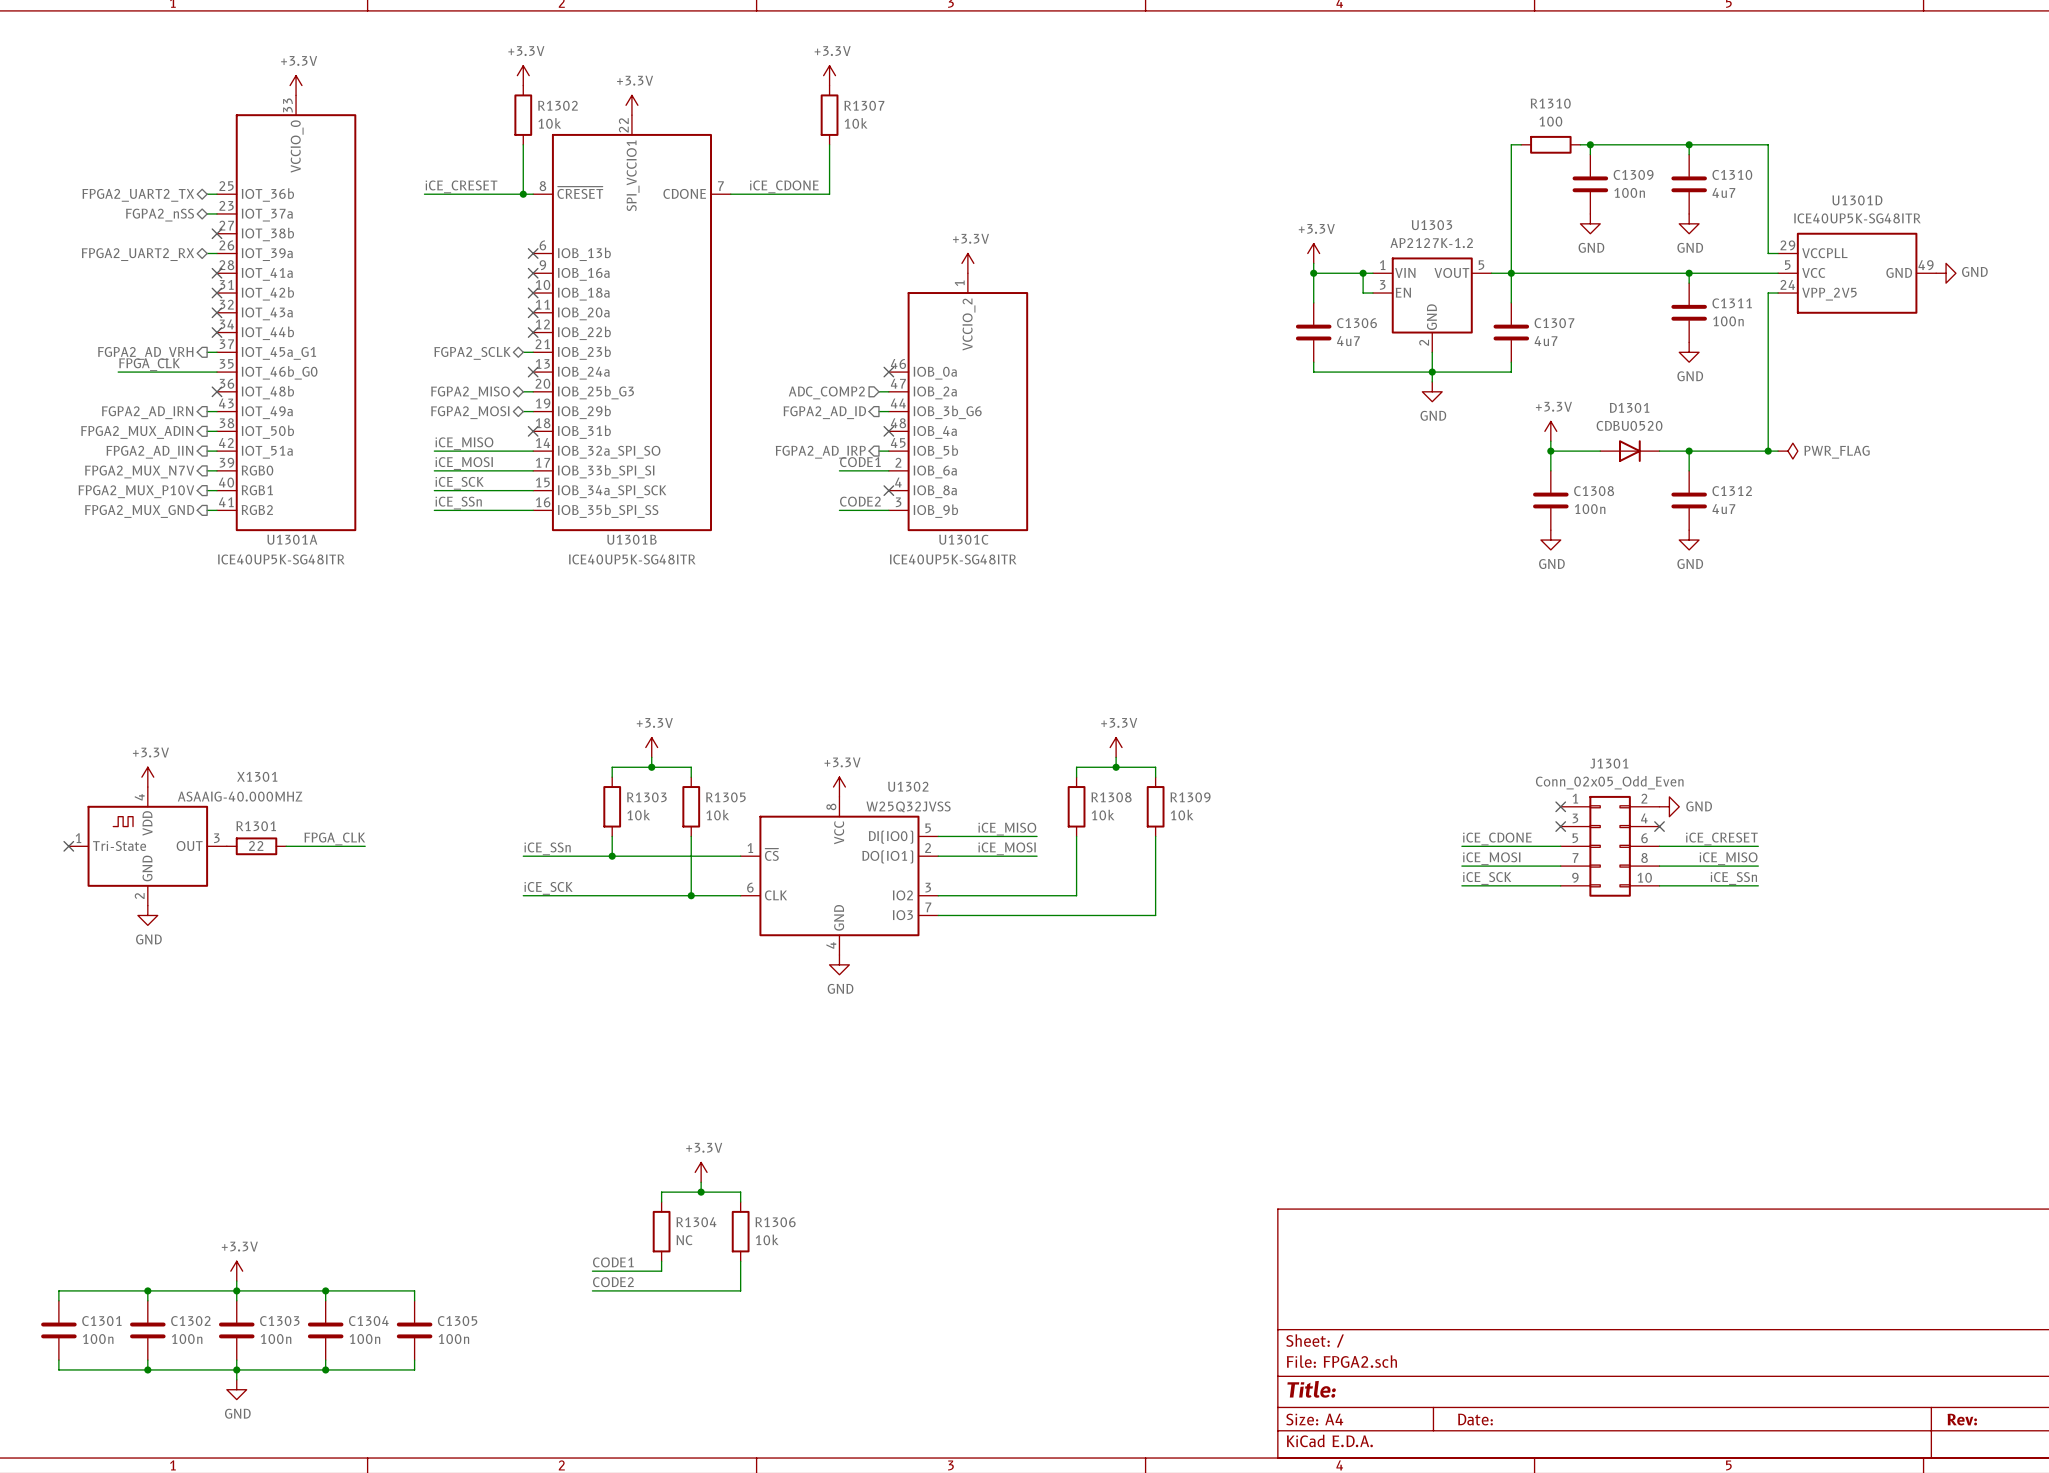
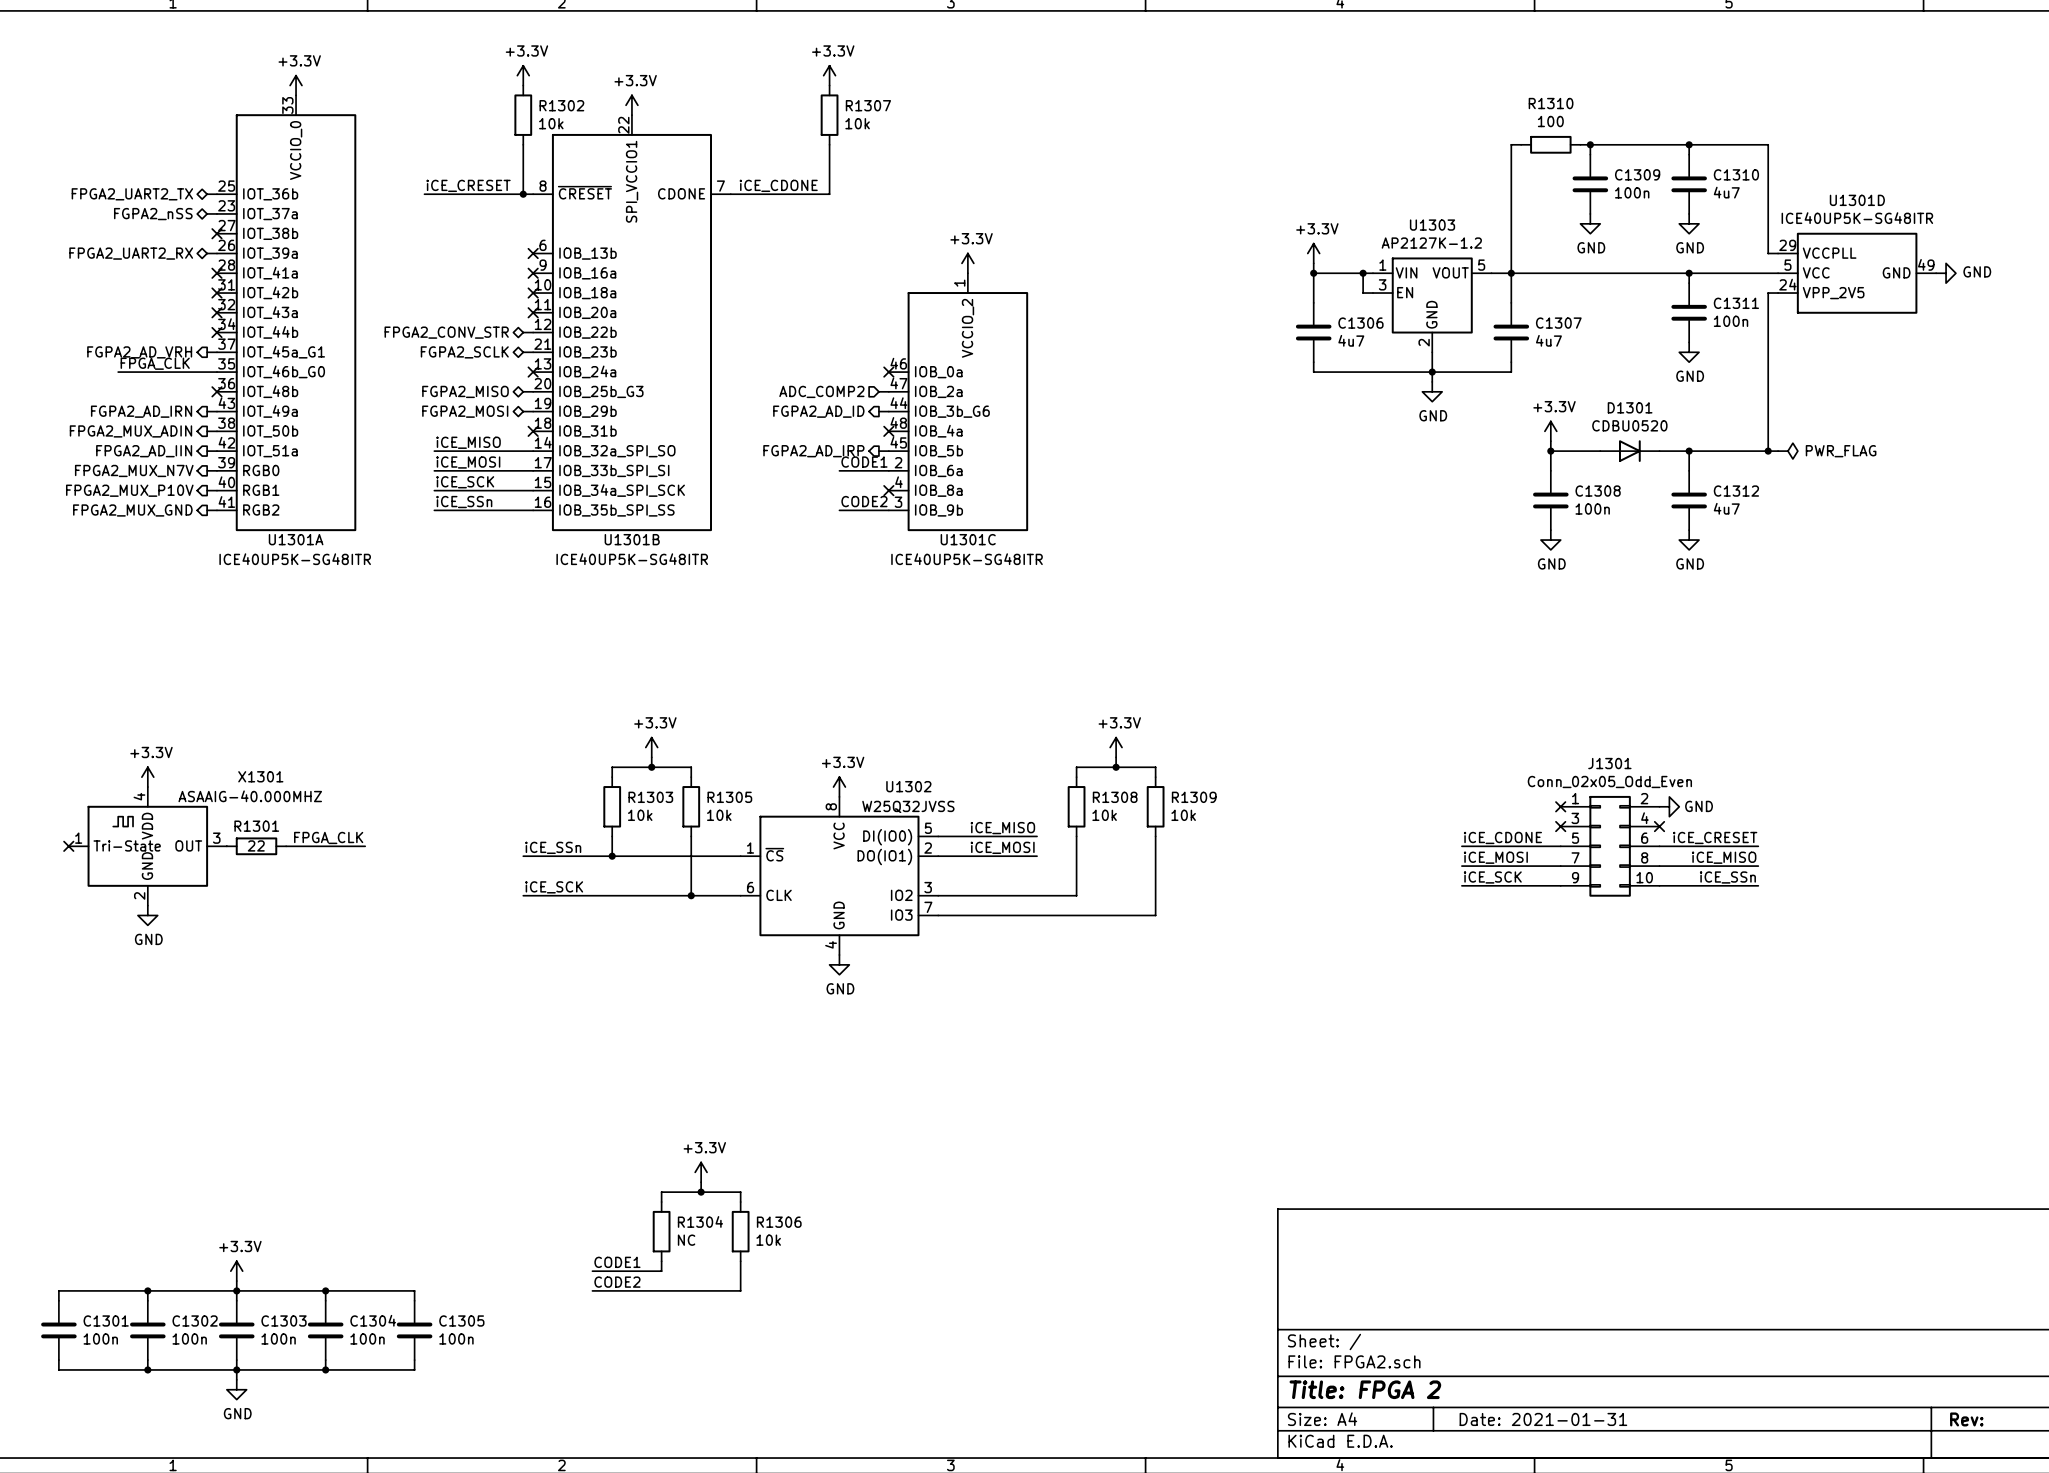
wire: none -> (523, 332) (533, 332)
no-connect mark: (533, 332) -> none
hierarchical label: none -> FPGA2_CONV_STR (446, 332)
title block: Title: (1311, 1389) -> Title: FPGA 2 (1365, 1389)
title block: Date: (1475, 1419) -> Date: 2021-01-31 (1543, 1419)

